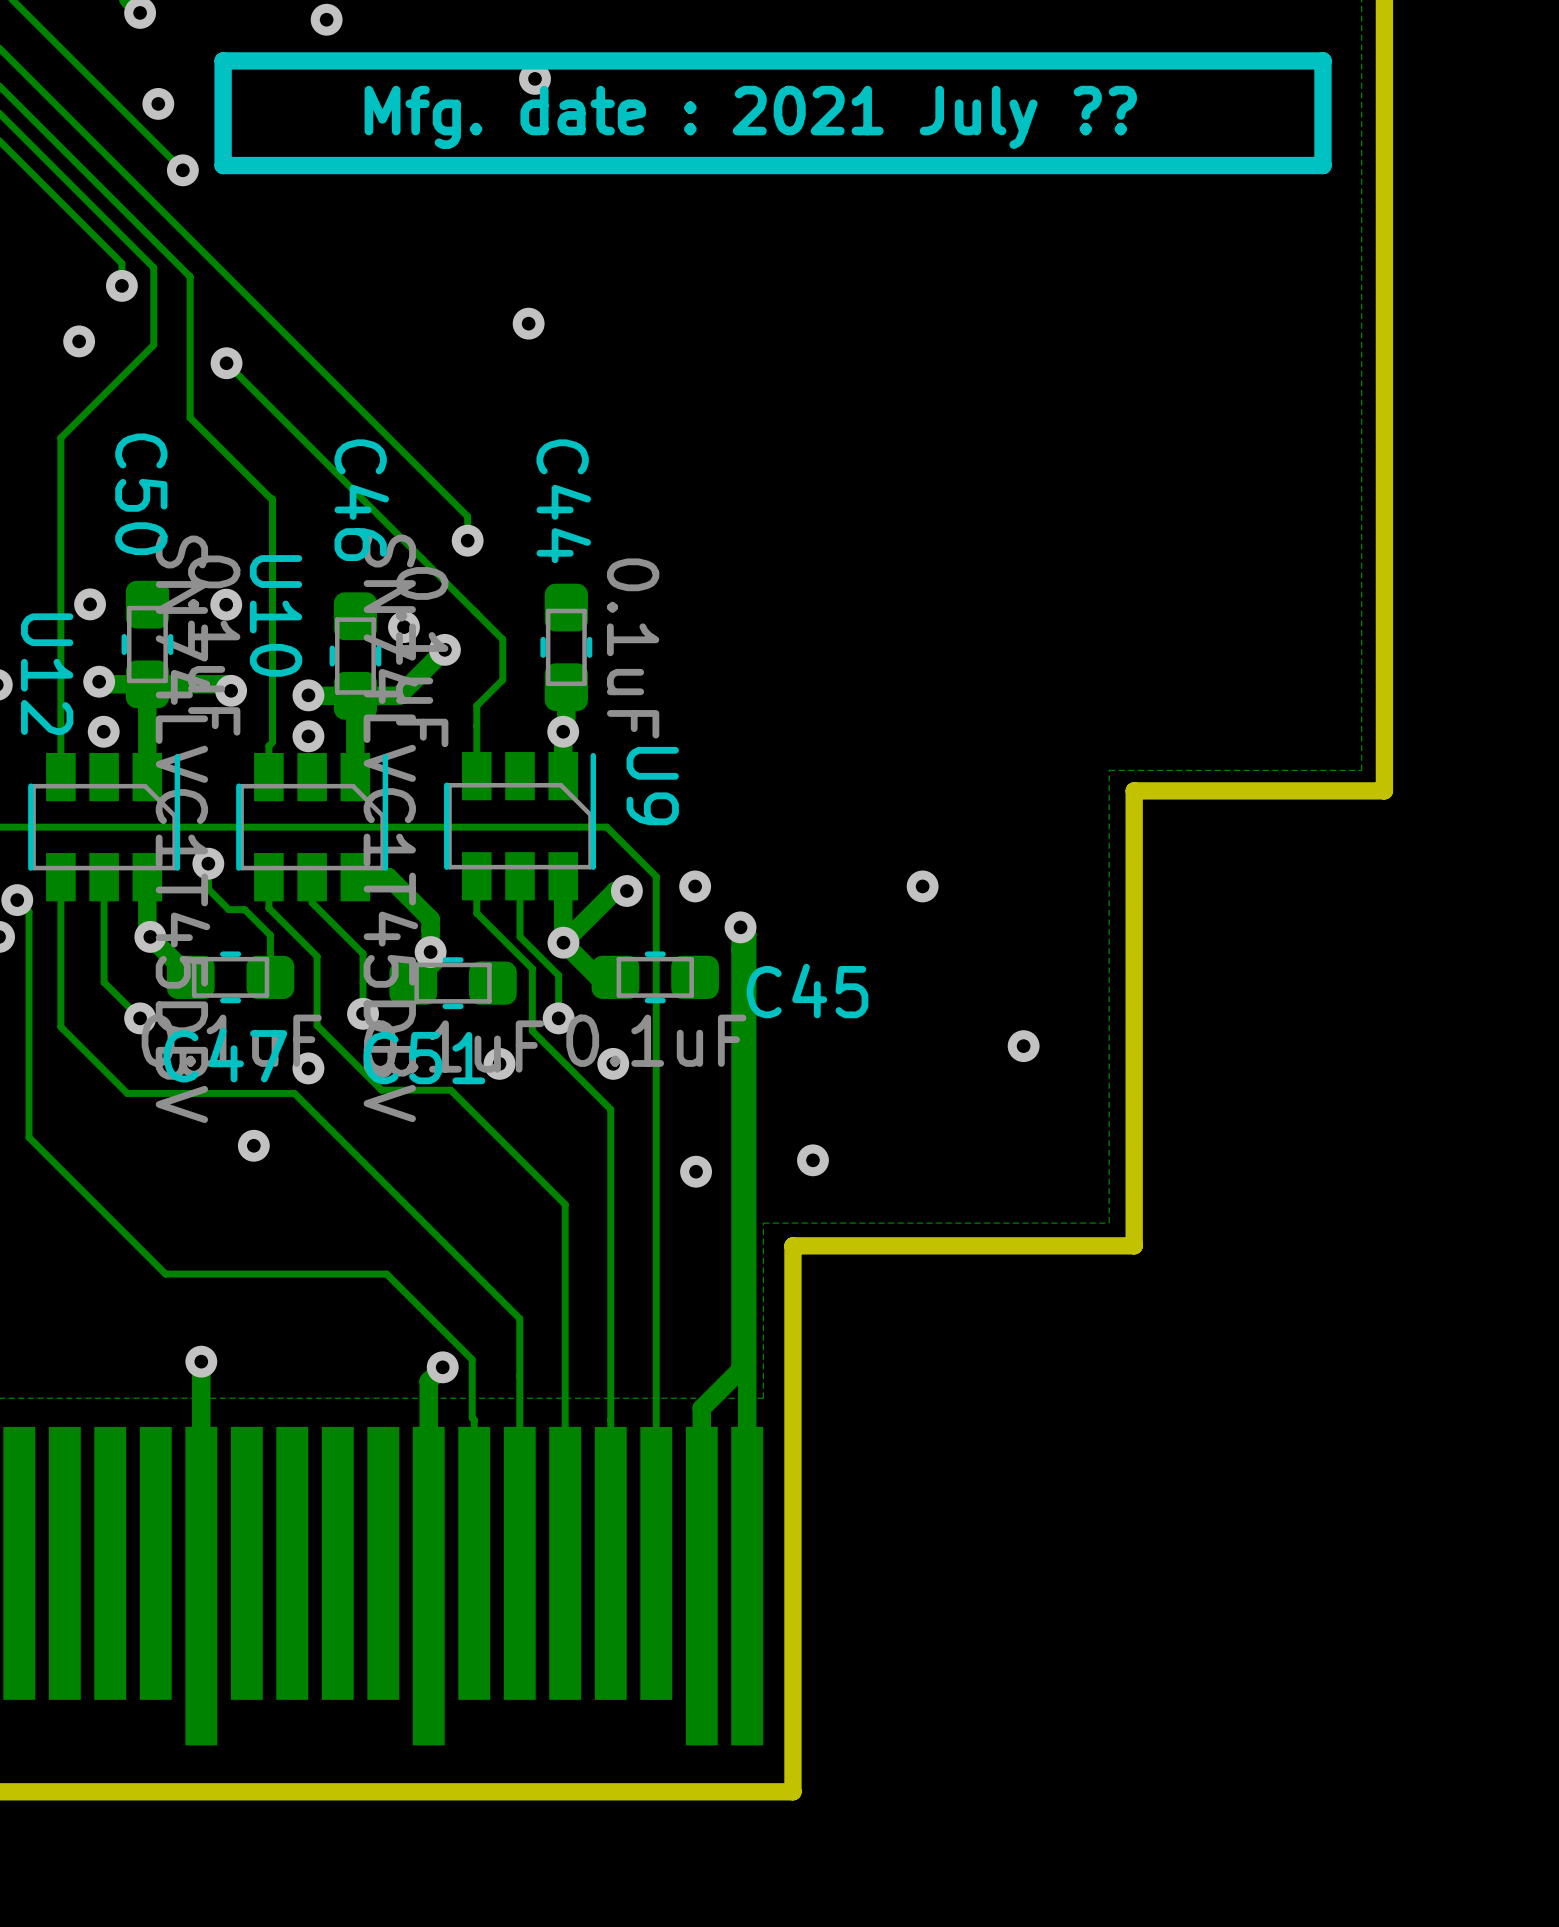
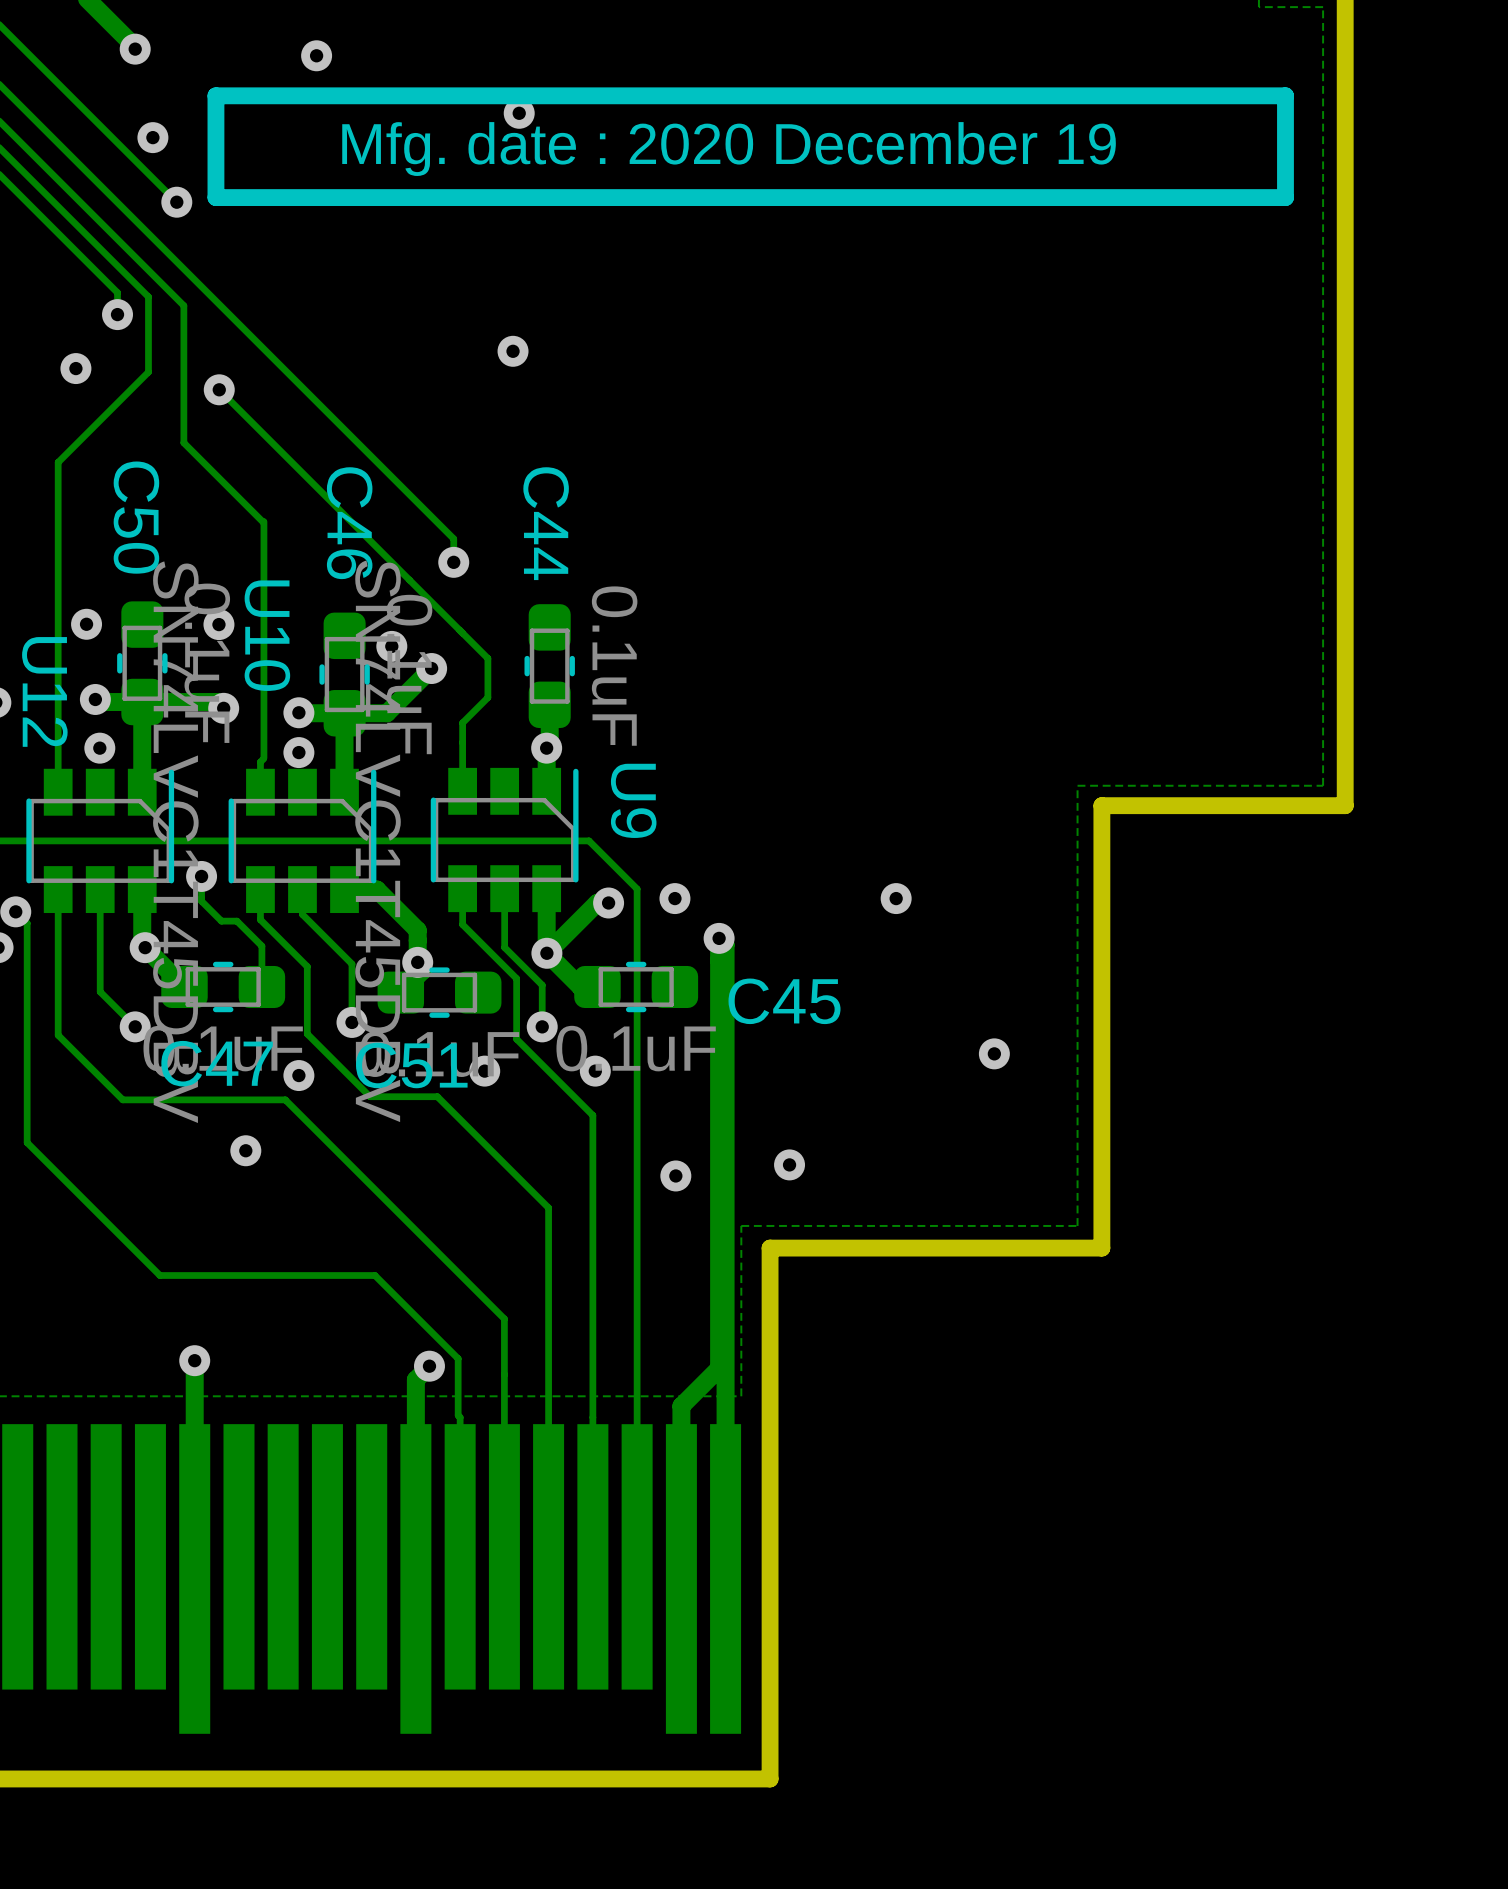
text: Mfg. date : 2021 July ?? (750, 117) -> Mfg. date : 2020 December 19 (729, 149)

